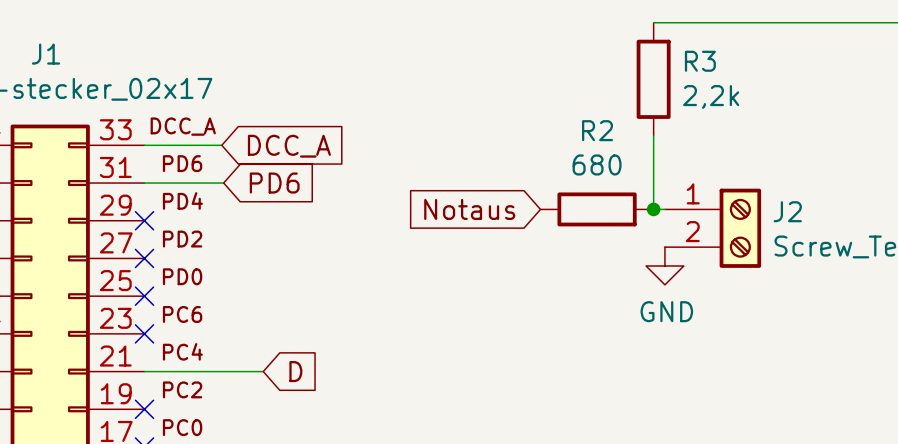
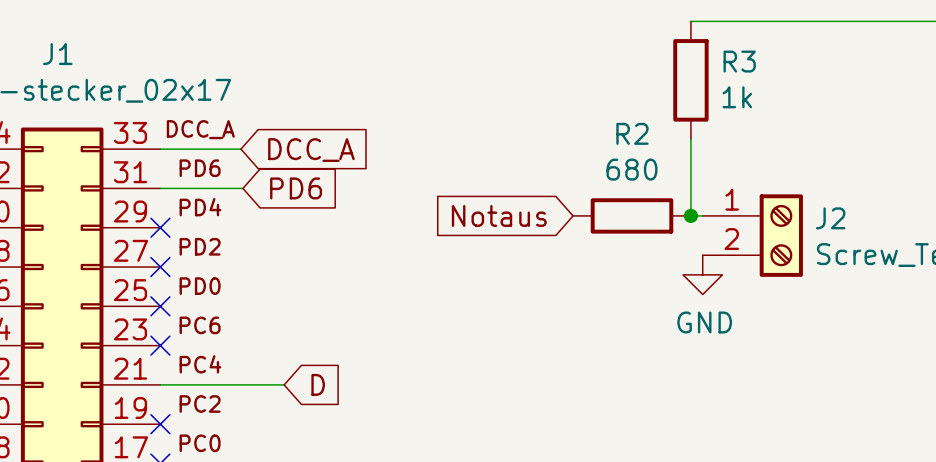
R3 value: 2,2k (711, 96) -> 1k (737, 97)

